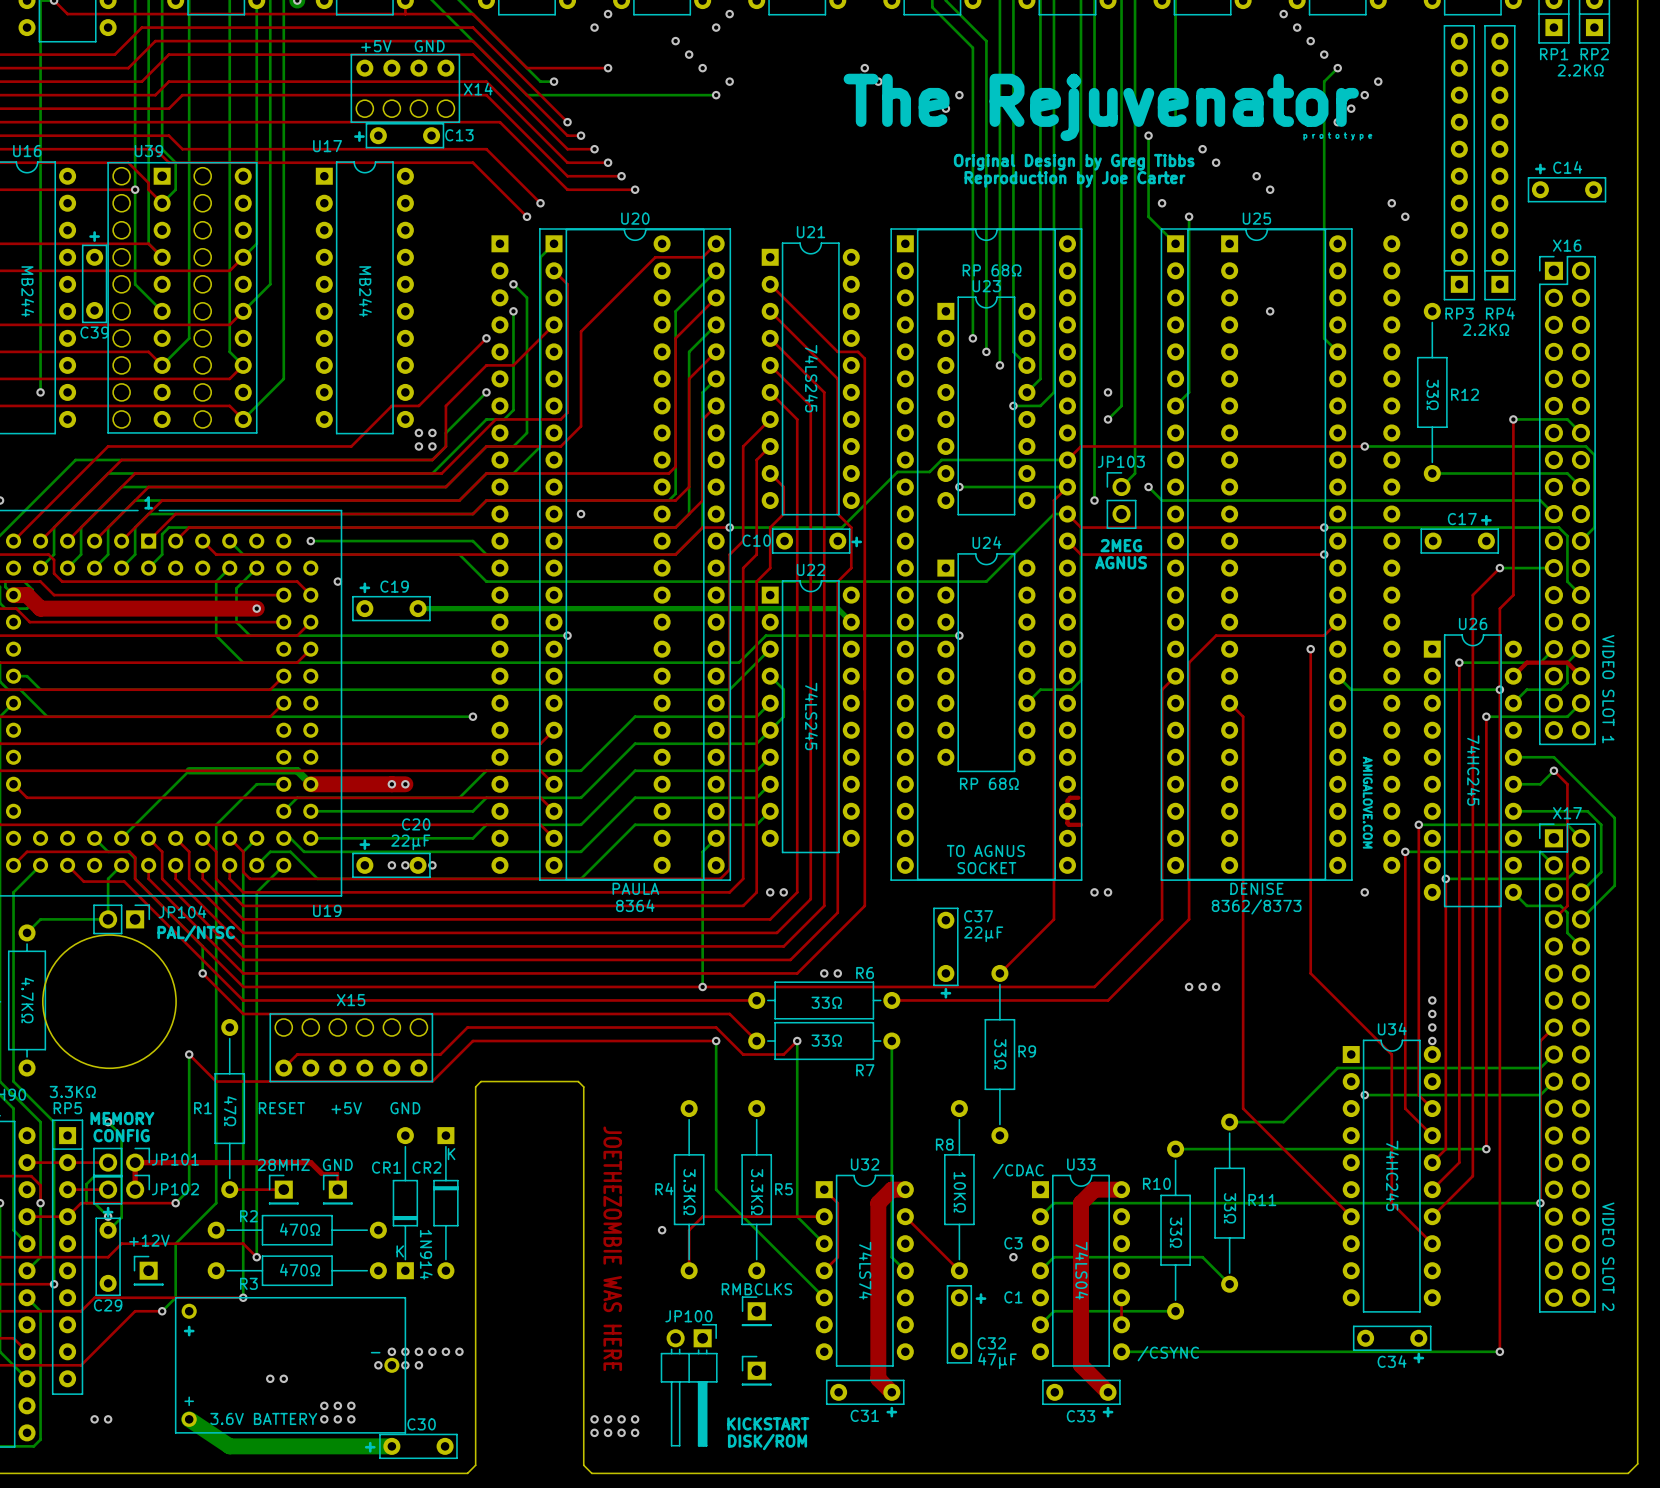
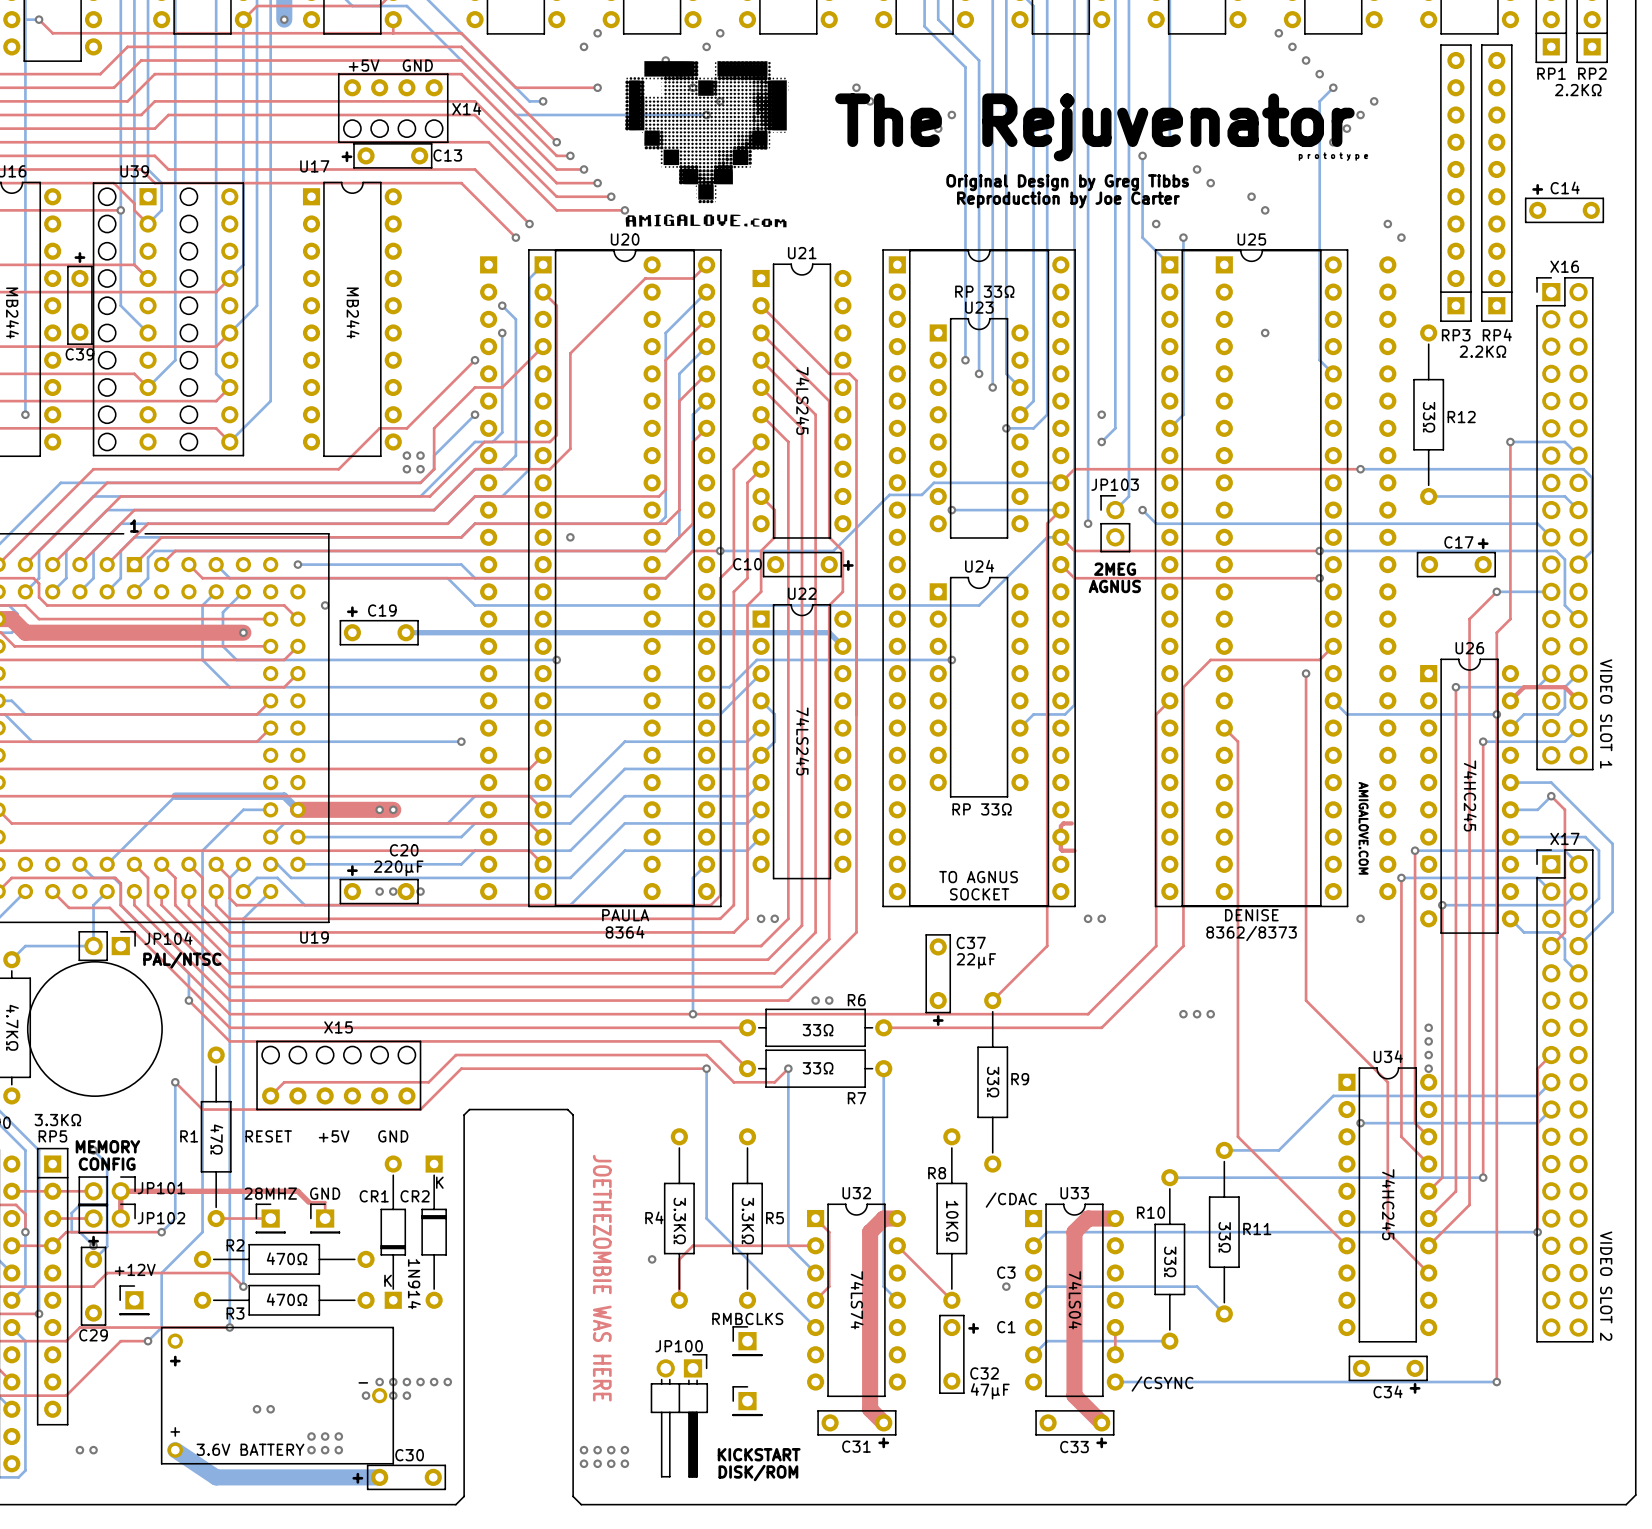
drawing: none -> [625, 61, 790, 228]
text: RP 68Ω (992, 270) -> RP 33Ω (984, 291)
text: RP 68Ω (989, 783) -> RP 33Ω (982, 809)
text: 22µF (410, 842) -> 220µF (398, 868)

